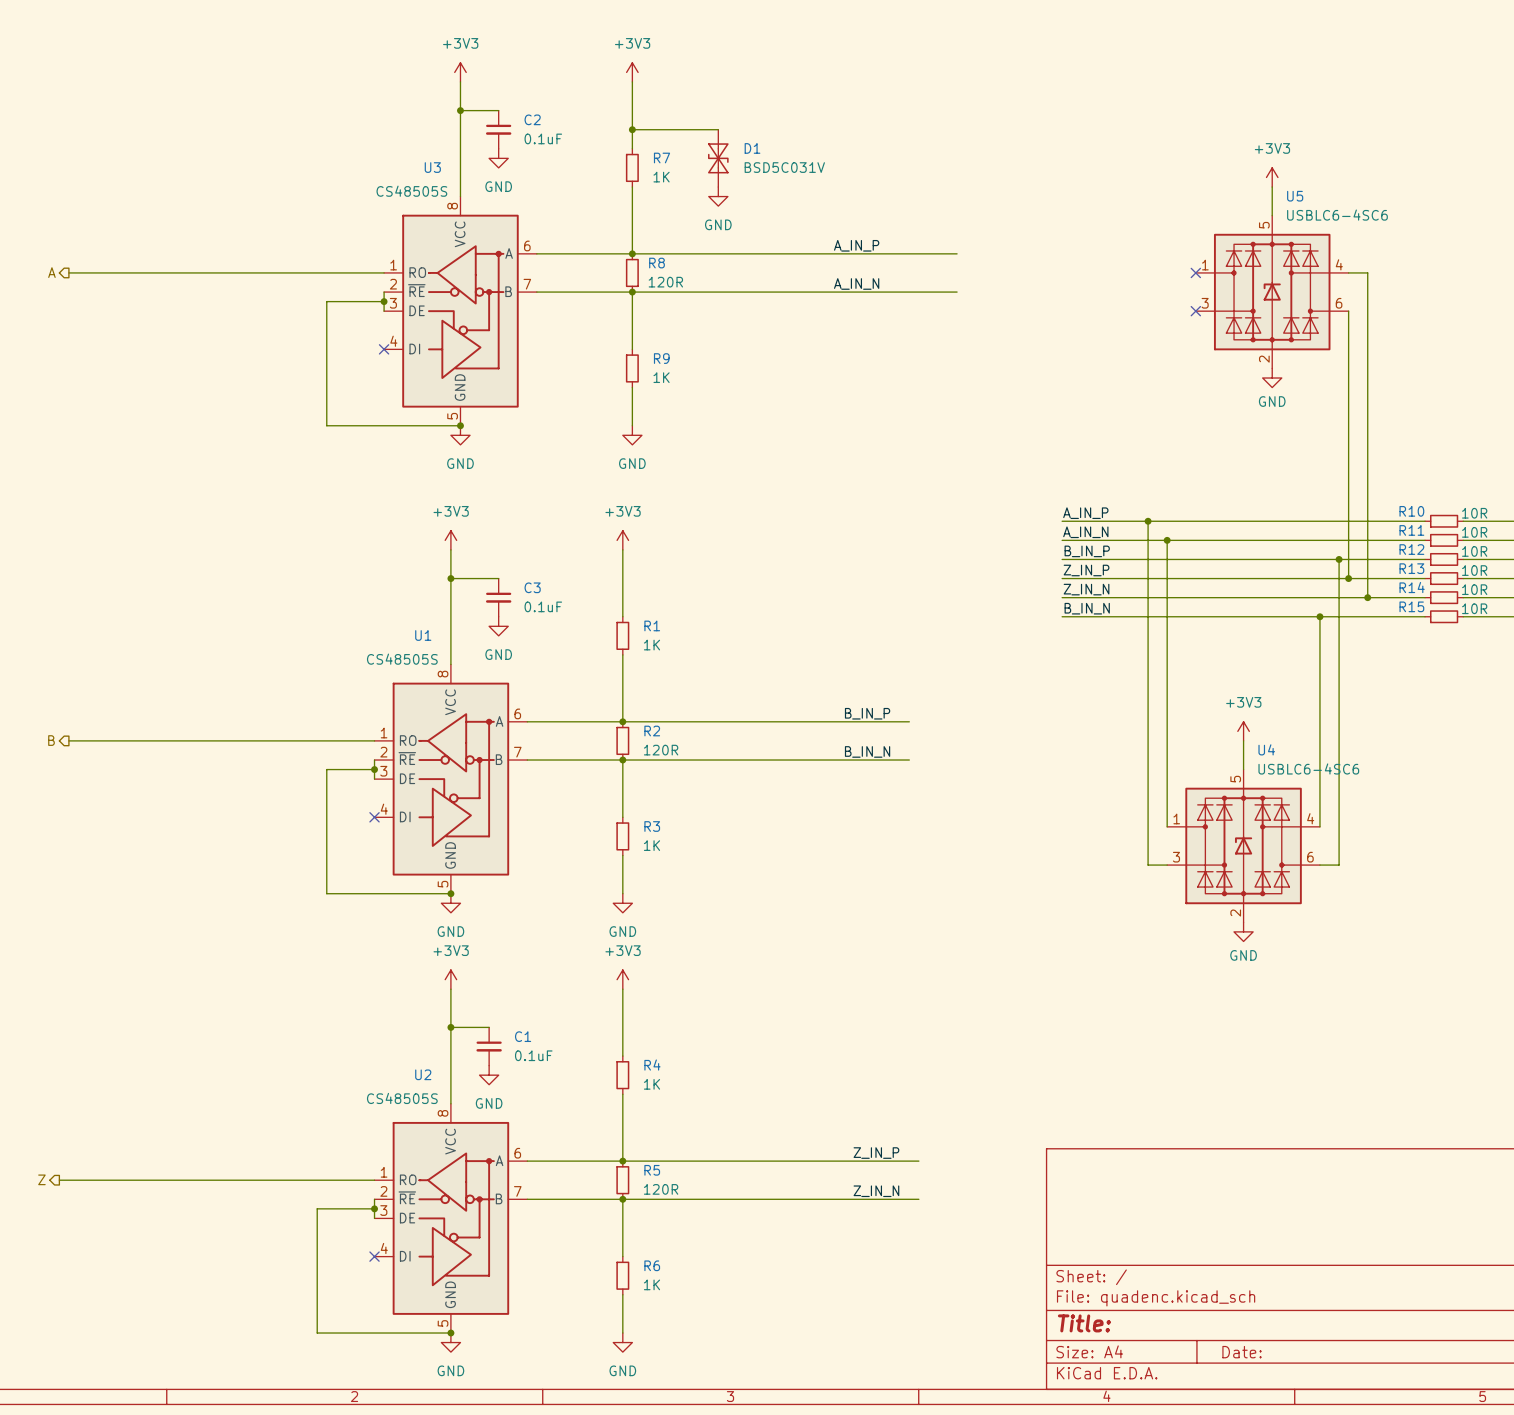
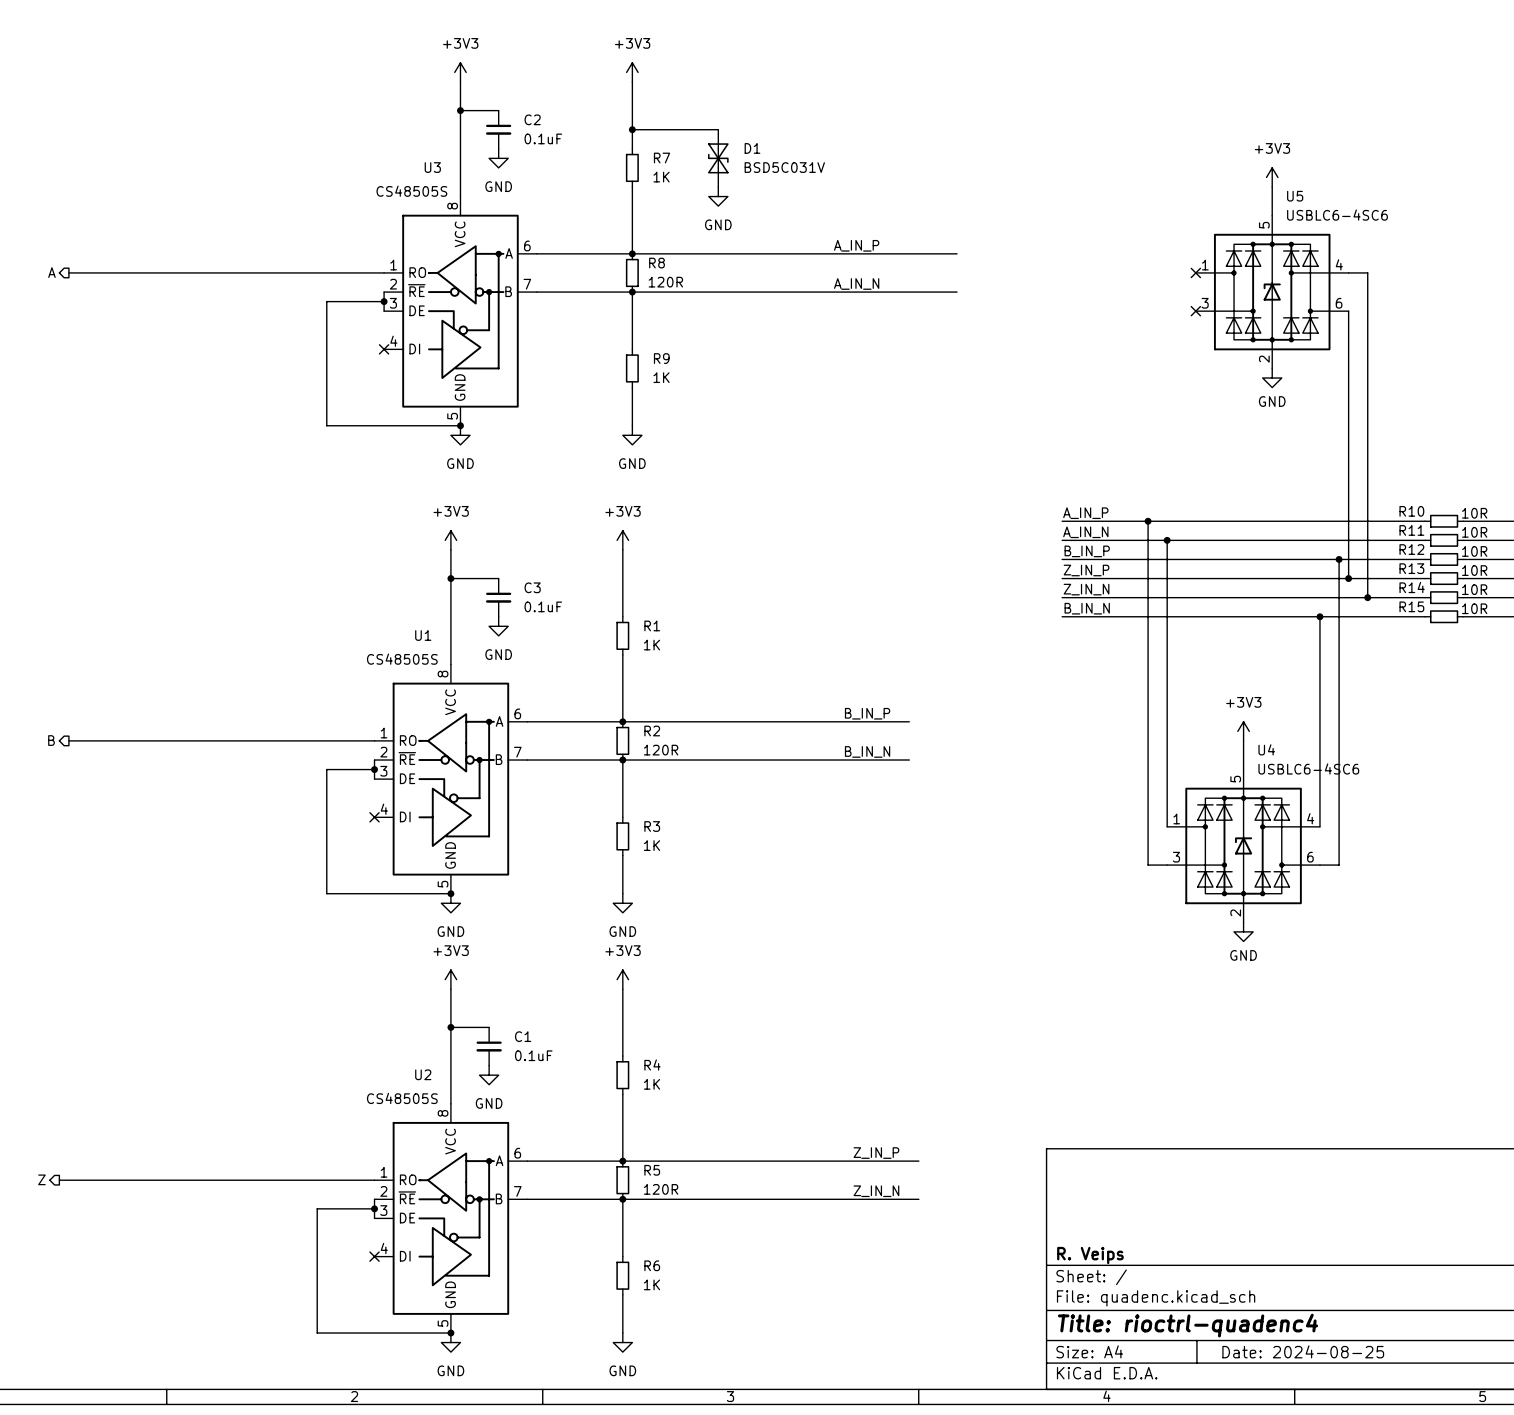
title block: none -> R. Veips (1090, 1255)
title block: Title: (1084, 1323) -> Title: rioctrl-quadenc4 (1188, 1325)
title block: Date: (1242, 1352) -> Date: 2024-08-25 (1303, 1351)

